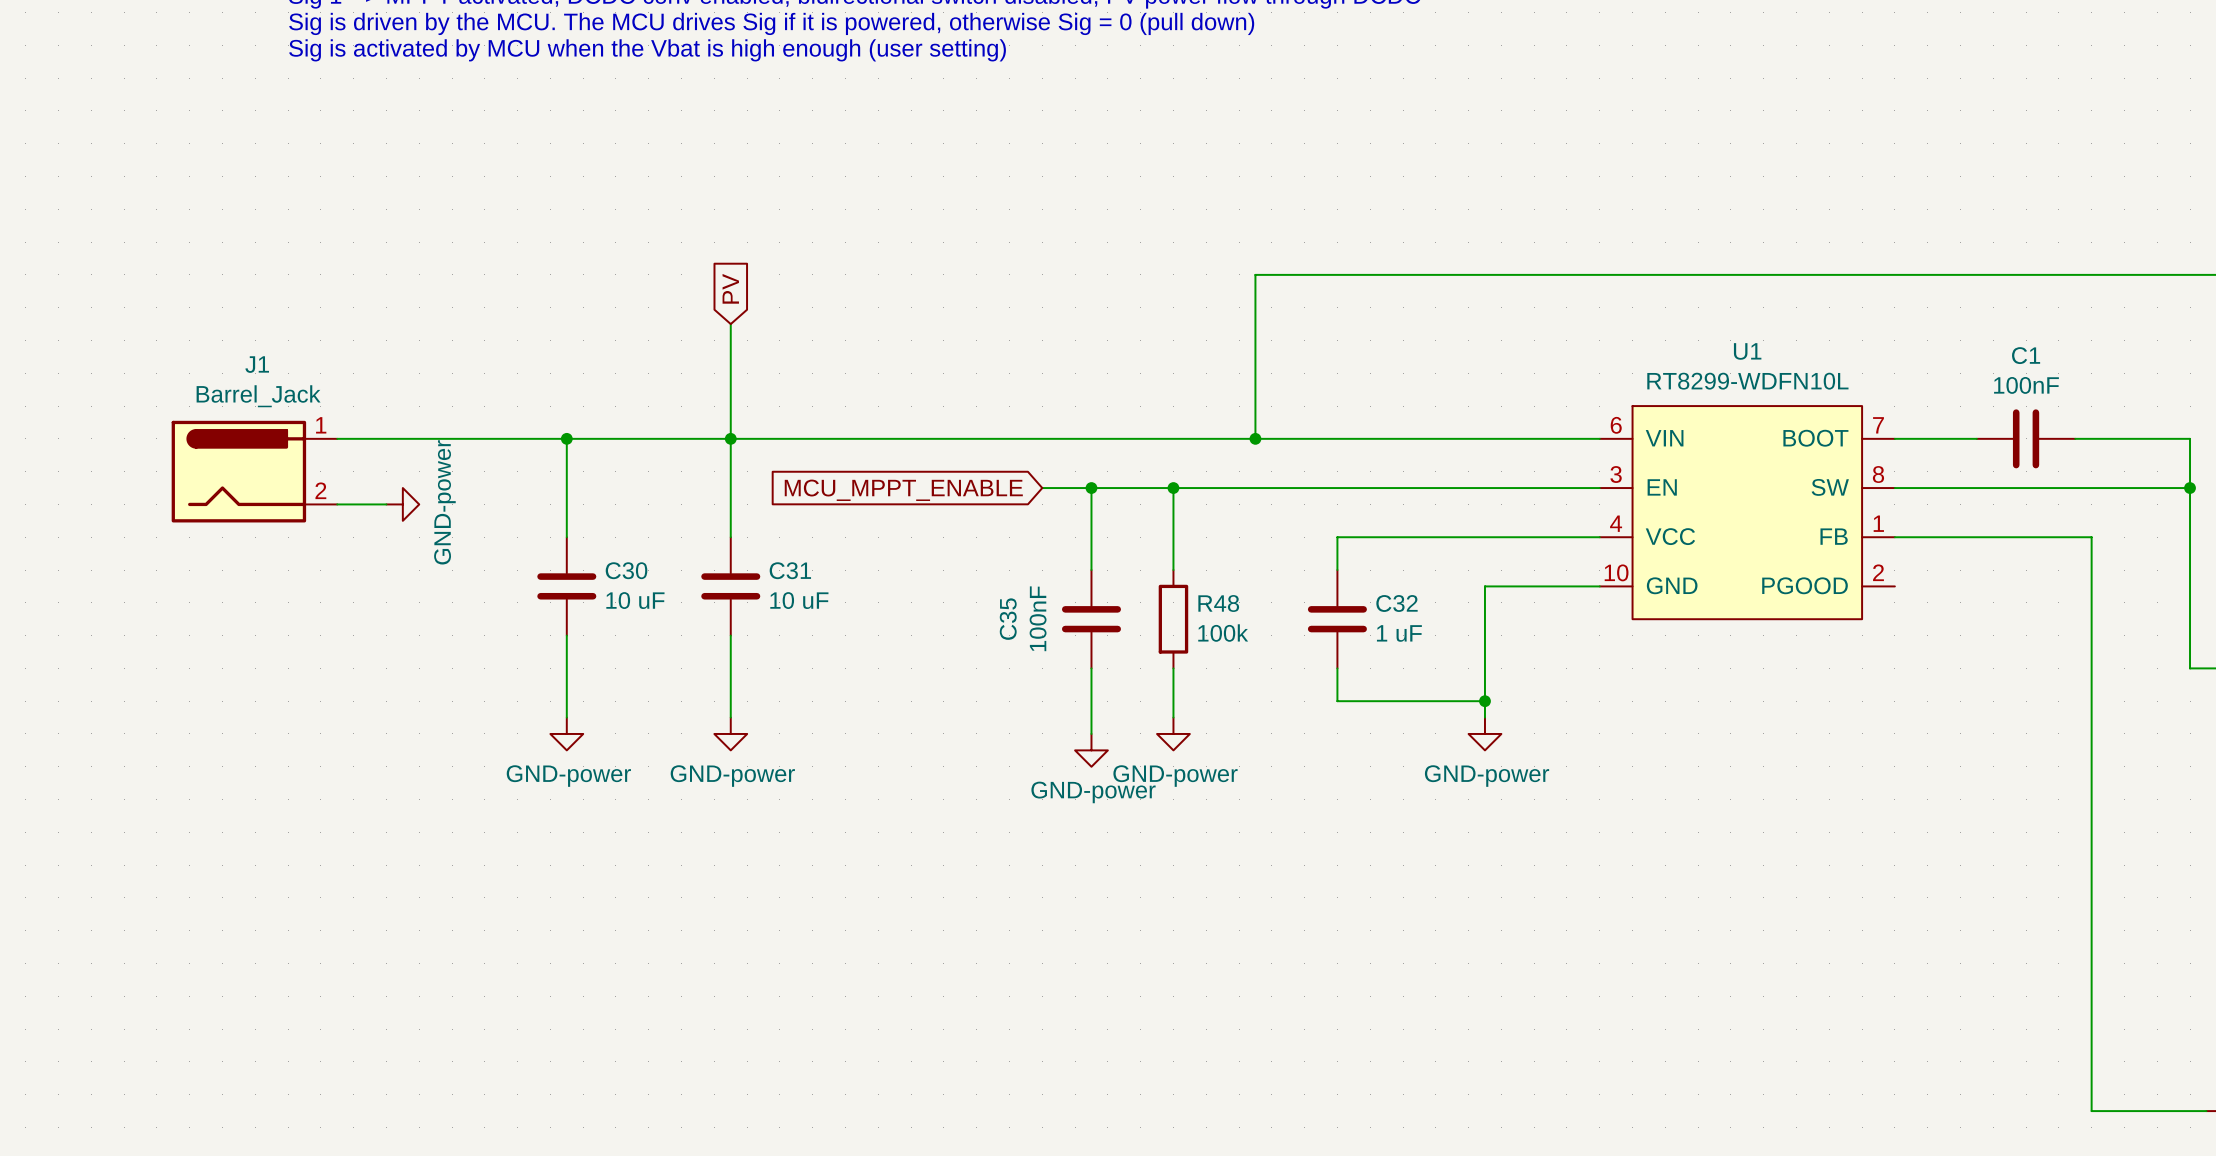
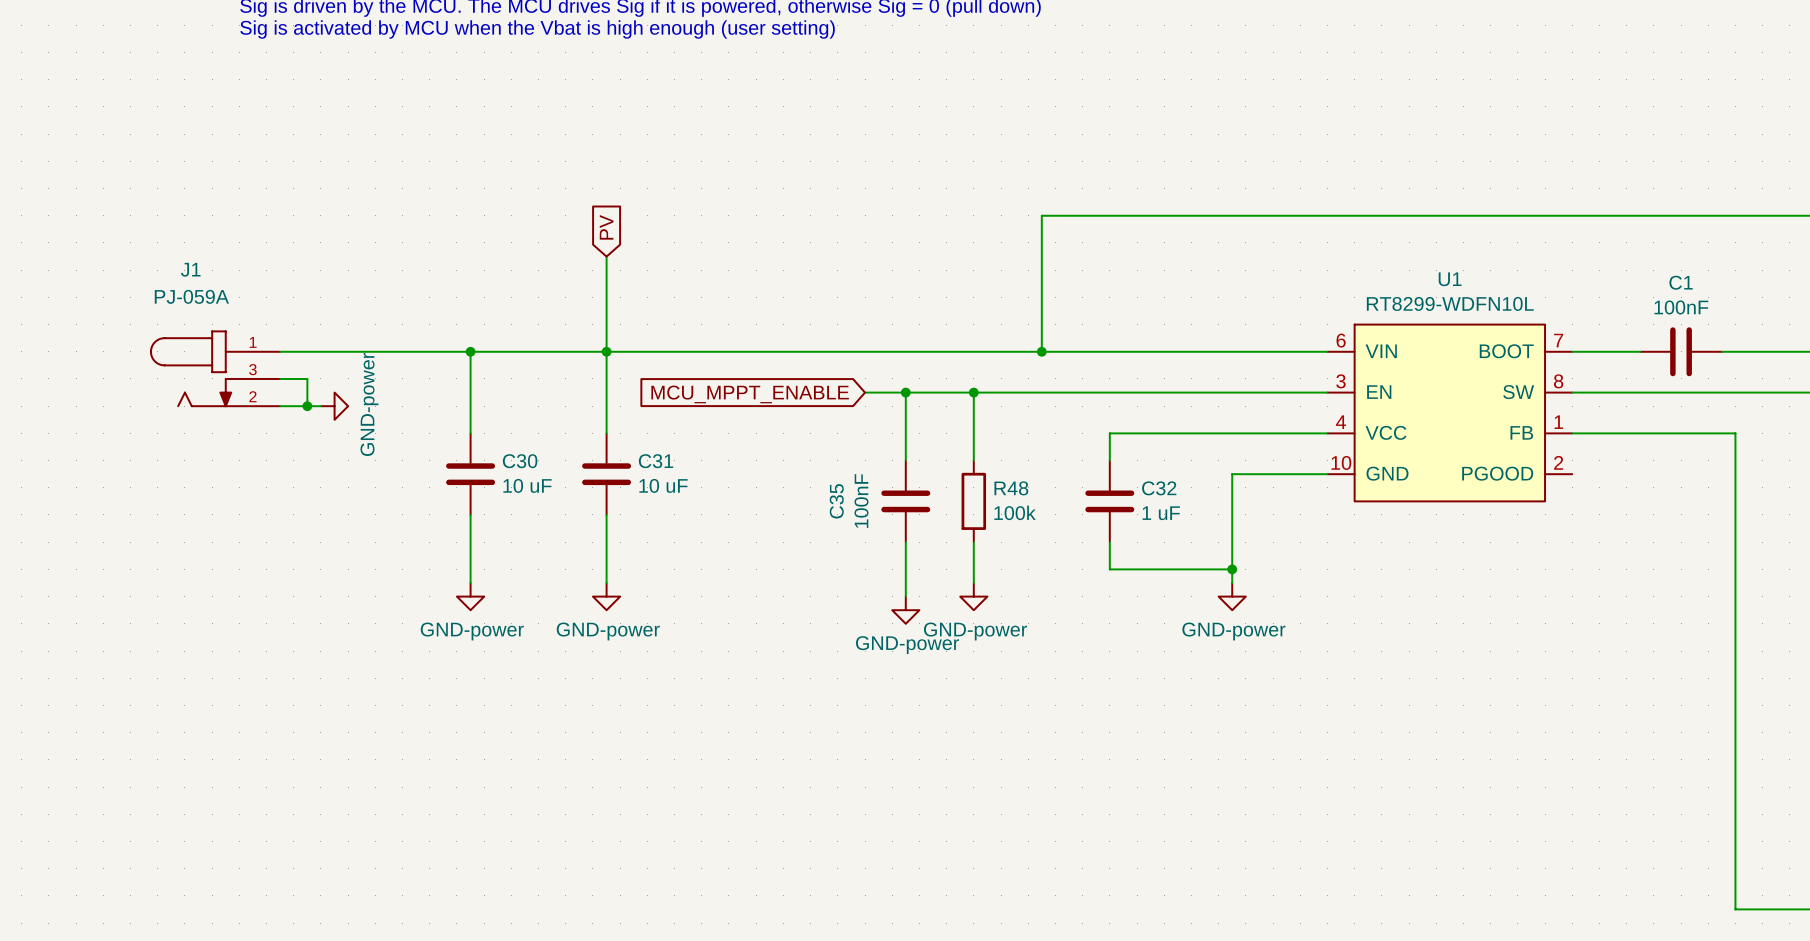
J1 name position: J1 (257, 364) -> J1 (190, 269)
J1 value: Barrel_Jack (258, 396) -> PJ-059A (191, 296)
J1 symbol: [171, 420, 338, 523] -> [150, 330, 281, 408]
wire: none -> (280, 378) (307, 378) (307, 406)
junction: none -> (307, 406)

